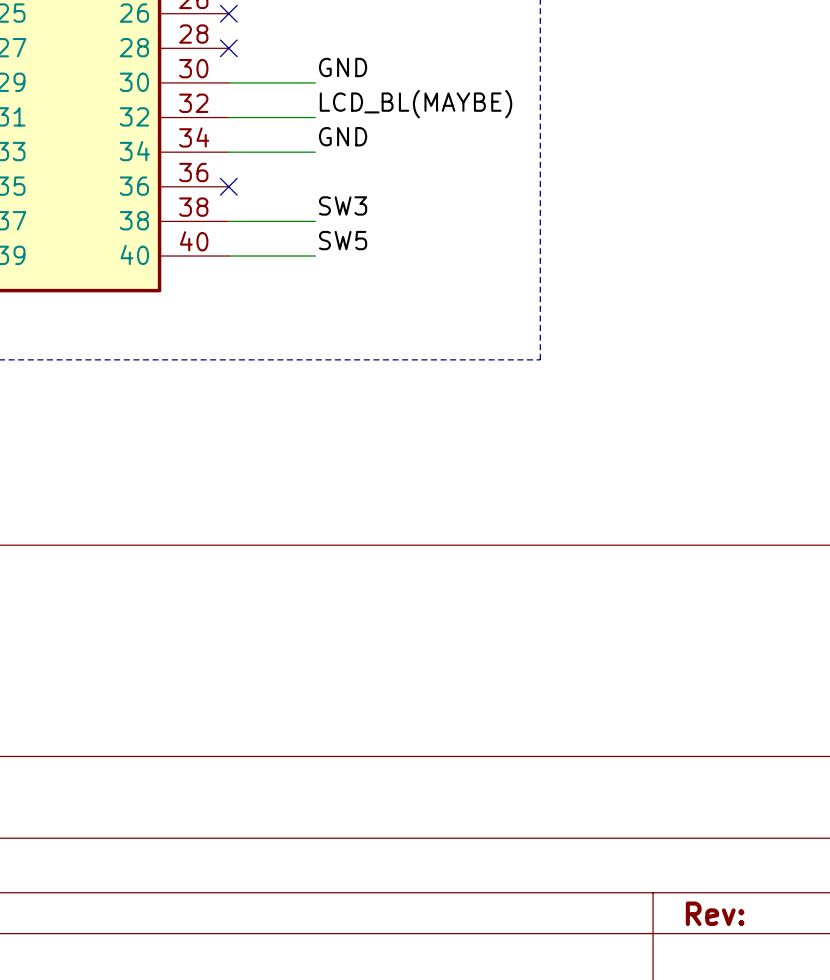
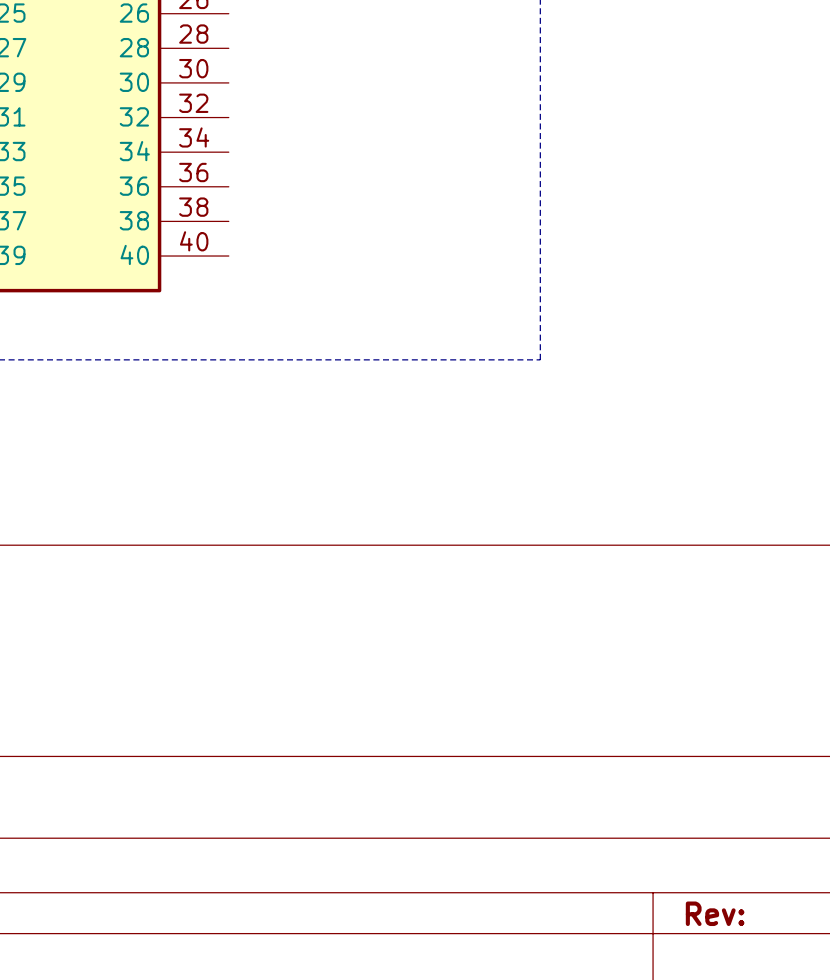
no-connect mark: (228, 13) -> none
no-connect mark: (228, 48) -> none
label: GND (343, 67) -> none
wire: (228, 82) (315, 82) -> none
label: LCD_BL(MAYBE) (416, 104) -> none
wire: (228, 117) (315, 117) -> none
label: GND (343, 136) -> none
wire: (228, 152) (315, 152) -> none
no-connect mark: (228, 186) -> none
label: SW3 (343, 205) -> none
wire: (228, 221) (315, 221) -> none
label: SW5 (343, 240) -> none
wire: (228, 256) (315, 256) -> none

